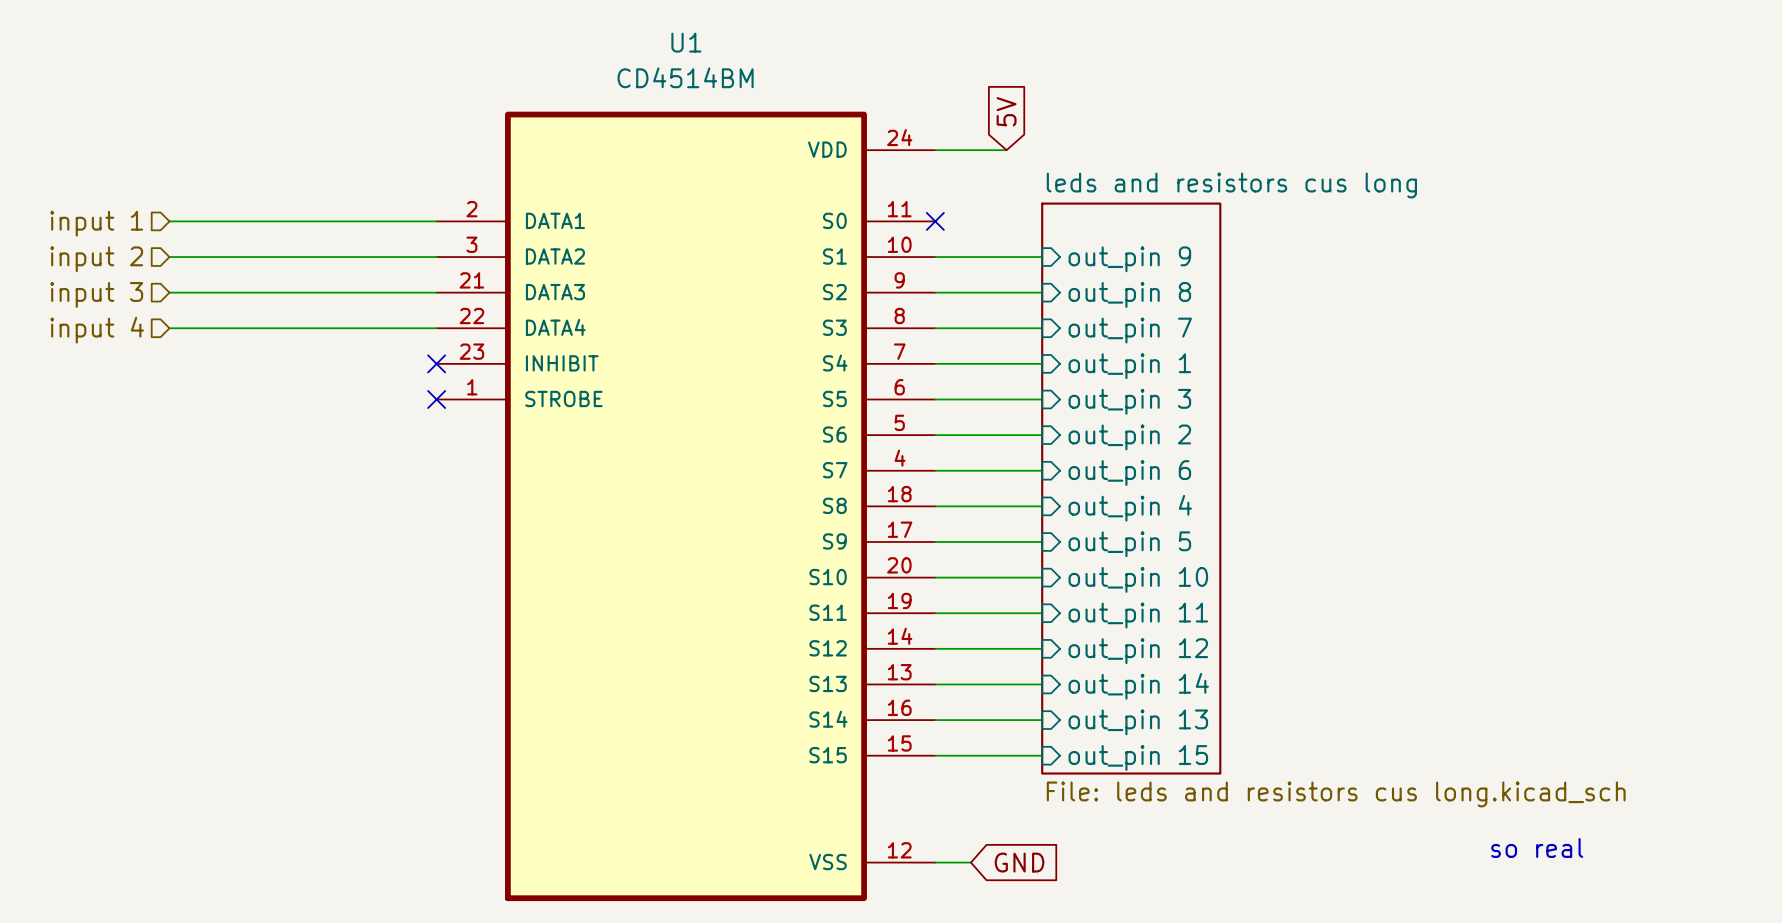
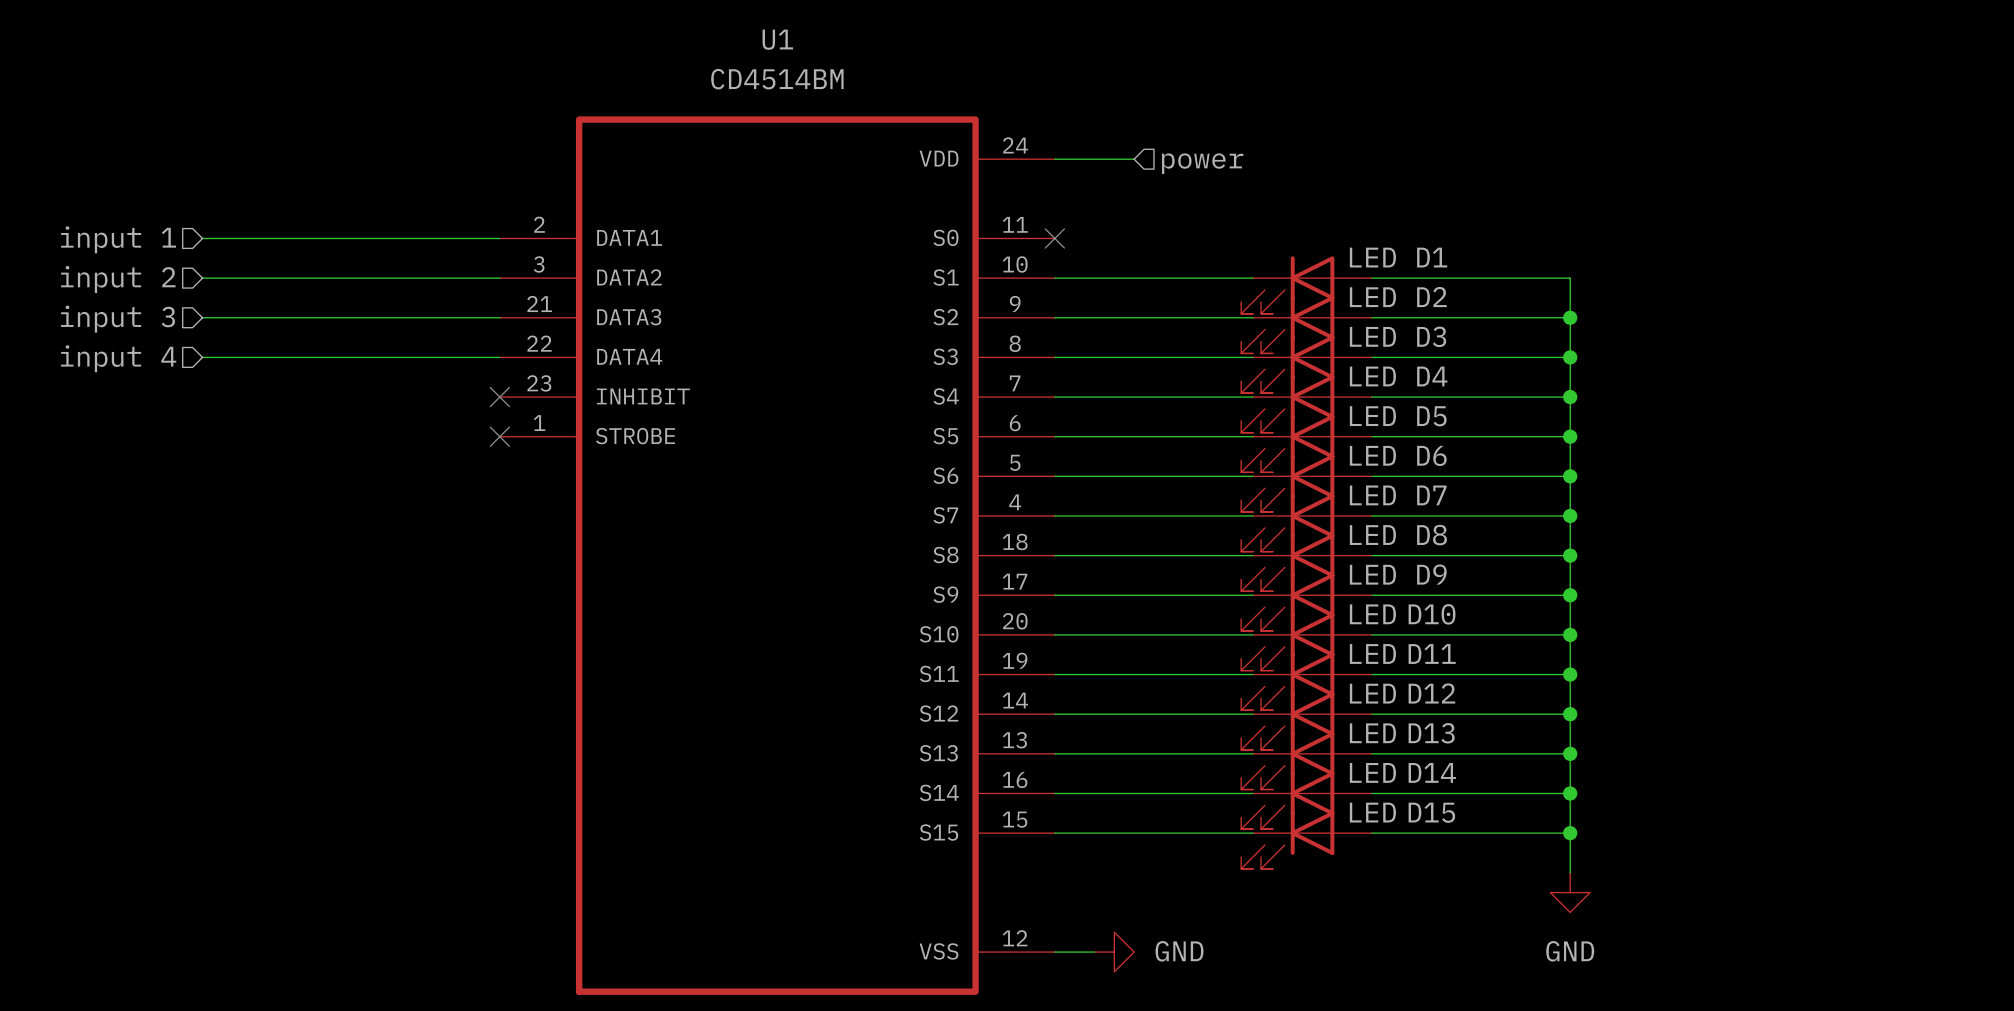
global label: 5V (1006, 111) -> none
hierarchical label: none -> power (1202, 163)
wire: none -> (1173, 278) (1253, 278)
wire: none -> (1372, 278) (1570, 278) (1570, 872)
sheet pin: out_pin 9 (1129, 259) -> none
D1: none -> LED (1306, 285)
wire: none -> (1173, 317) (1253, 317)
wire: none -> (1372, 317) (1570, 317)
junction: none -> (1570, 317)
sheet pin: out_pin 8 (1129, 294) -> none
D2: none -> LED (1306, 324)
wire: none -> (1173, 357) (1253, 357)
wire: none -> (1372, 357) (1570, 357)
junction: none -> (1570, 357)
sheet pin: out_pin 7 (1130, 330) -> none
D3: none -> LED (1306, 364)
wire: none -> (1173, 397) (1253, 397)
wire: none -> (1372, 397) (1570, 397)
junction: none -> (1570, 397)
sheet pin: out_pin 1 (1129, 366) -> none
D4: none -> LED (1306, 403)
wire: none -> (1173, 436) (1253, 436)
wire: none -> (1372, 436) (1570, 436)
junction: none -> (1570, 436)
sheet pin: out_pin 3 (1129, 401) -> none
D5: none -> LED (1306, 443)
wire: none -> (1173, 476) (1253, 476)
wire: none -> (1372, 476) (1570, 476)
junction: none -> (1570, 476)
sheet pin: out_pin 2 (1129, 437) -> none
D6: none -> LED (1306, 483)
wire: none -> (1173, 515) (1253, 515)
wire: none -> (1372, 515) (1570, 515)
junction: none -> (1570, 515)
sheet pin: out_pin 6 (1129, 473) -> none
D7: none -> LED (1306, 522)
sheet leds and resistors cus long: File: leds and resistors cus long.kicad_sch (1131, 488) -> none
wire: none -> (1173, 555) (1253, 555)
wire: none -> (1372, 555) (1570, 555)
junction: none -> (1570, 555)
sheet pin: out_pin 4 (1130, 508) -> none
D8: none -> LED (1306, 562)
wire: none -> (1173, 595) (1253, 595)
wire: none -> (1372, 595) (1570, 595)
junction: none -> (1570, 595)
sheet pin: out_pin 5 (1129, 544) -> none
D9: none -> LED (1306, 602)
wire: none -> (1173, 634) (1253, 634)
wire: none -> (1372, 634) (1570, 634)
junction: none -> (1570, 634)
sheet pin: out_pin 10 (1138, 579) -> none
D10: none -> LED (1306, 641)
wire: none -> (1173, 674) (1253, 674)
wire: none -> (1372, 674) (1570, 674)
junction: none -> (1570, 674)
sheet pin: out_pin 11 (1138, 615) -> none
D11: none -> LED (1306, 681)
wire: none -> (1173, 714) (1253, 714)
wire: none -> (1372, 714) (1570, 714)
junction: none -> (1570, 714)
sheet pin: out_pin 12 (1138, 651) -> none
D12: none -> LED (1306, 721)
wire: none -> (1173, 753) (1253, 753)
wire: none -> (1372, 753) (1570, 753)
junction: none -> (1570, 753)
sheet pin: out_pin 14 (1138, 686) -> none
D13: none -> LED (1306, 760)
wire: none -> (1173, 793) (1253, 793)
wire: none -> (1372, 793) (1570, 793)
junction: none -> (1570, 793)
sheet pin: out_pin 13 (1138, 722) -> none
D14: none -> LED (1306, 800)
wire: none -> (1173, 833) (1253, 833)
wire: none -> (1372, 833) (1570, 833)
junction: none -> (1570, 833)
sheet pin: out_pin 15 (1138, 758) -> none
D15: none -> LED (1306, 840)
power symbol: none -> GND (1570, 892)
text: so real (1537, 847) -> none
power symbol: none -> GND (1114, 952)
global label: GND (1019, 862) -> none

